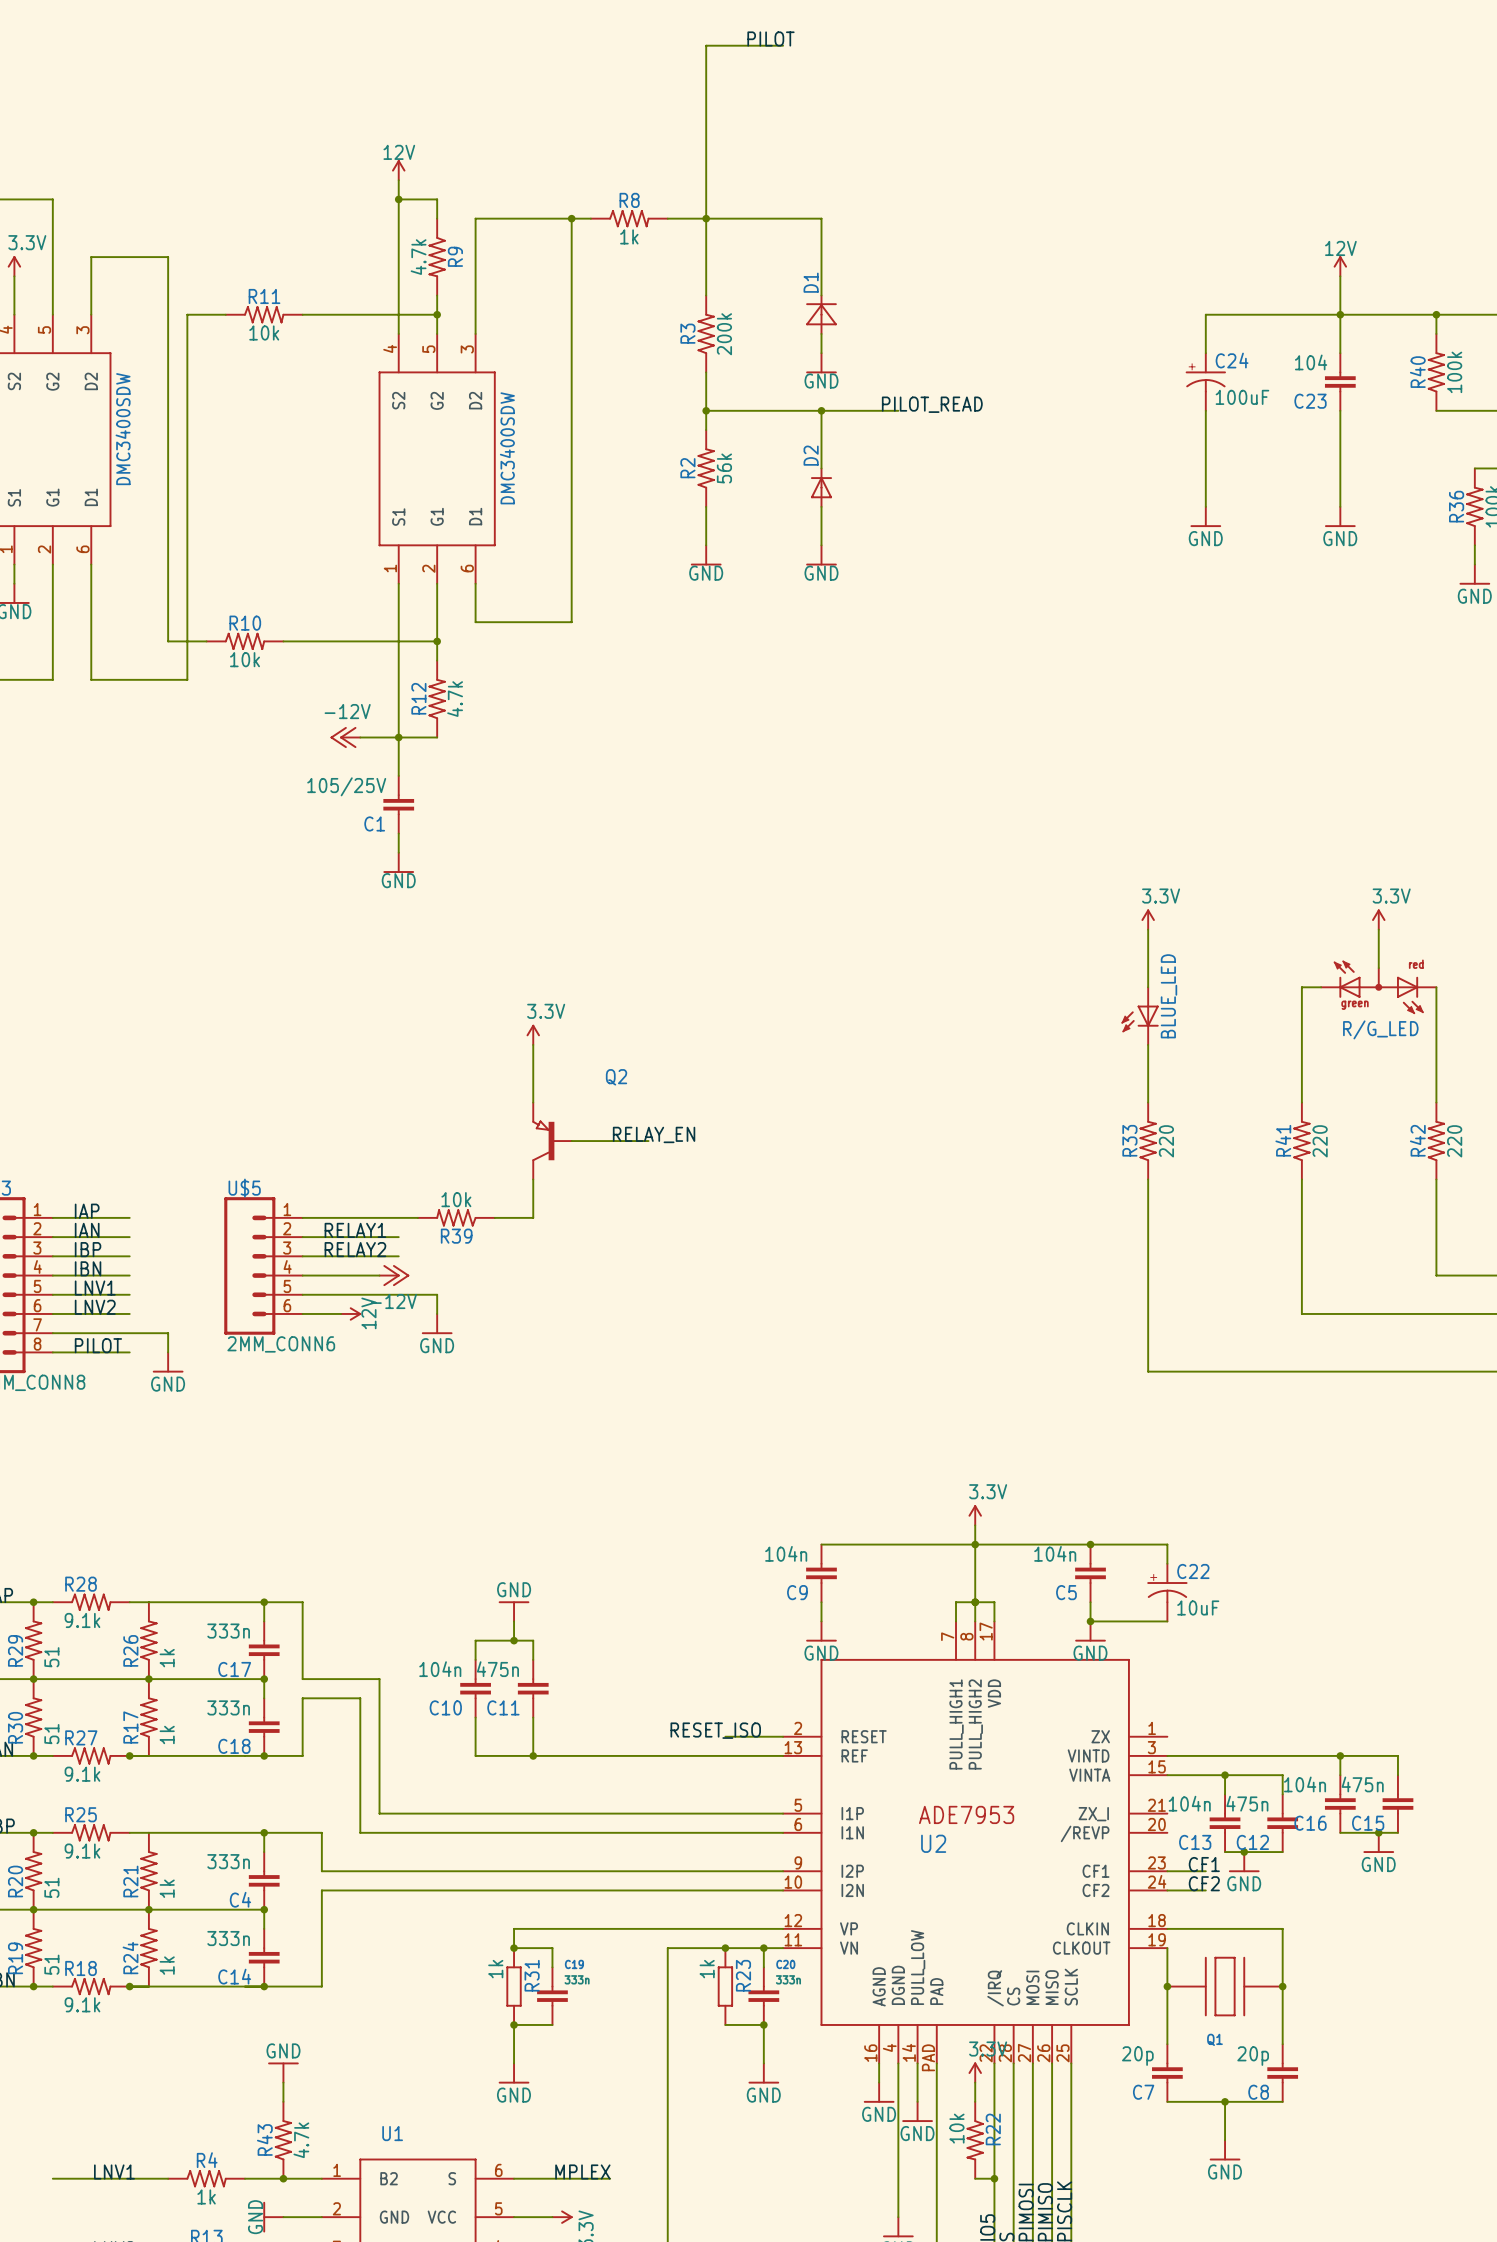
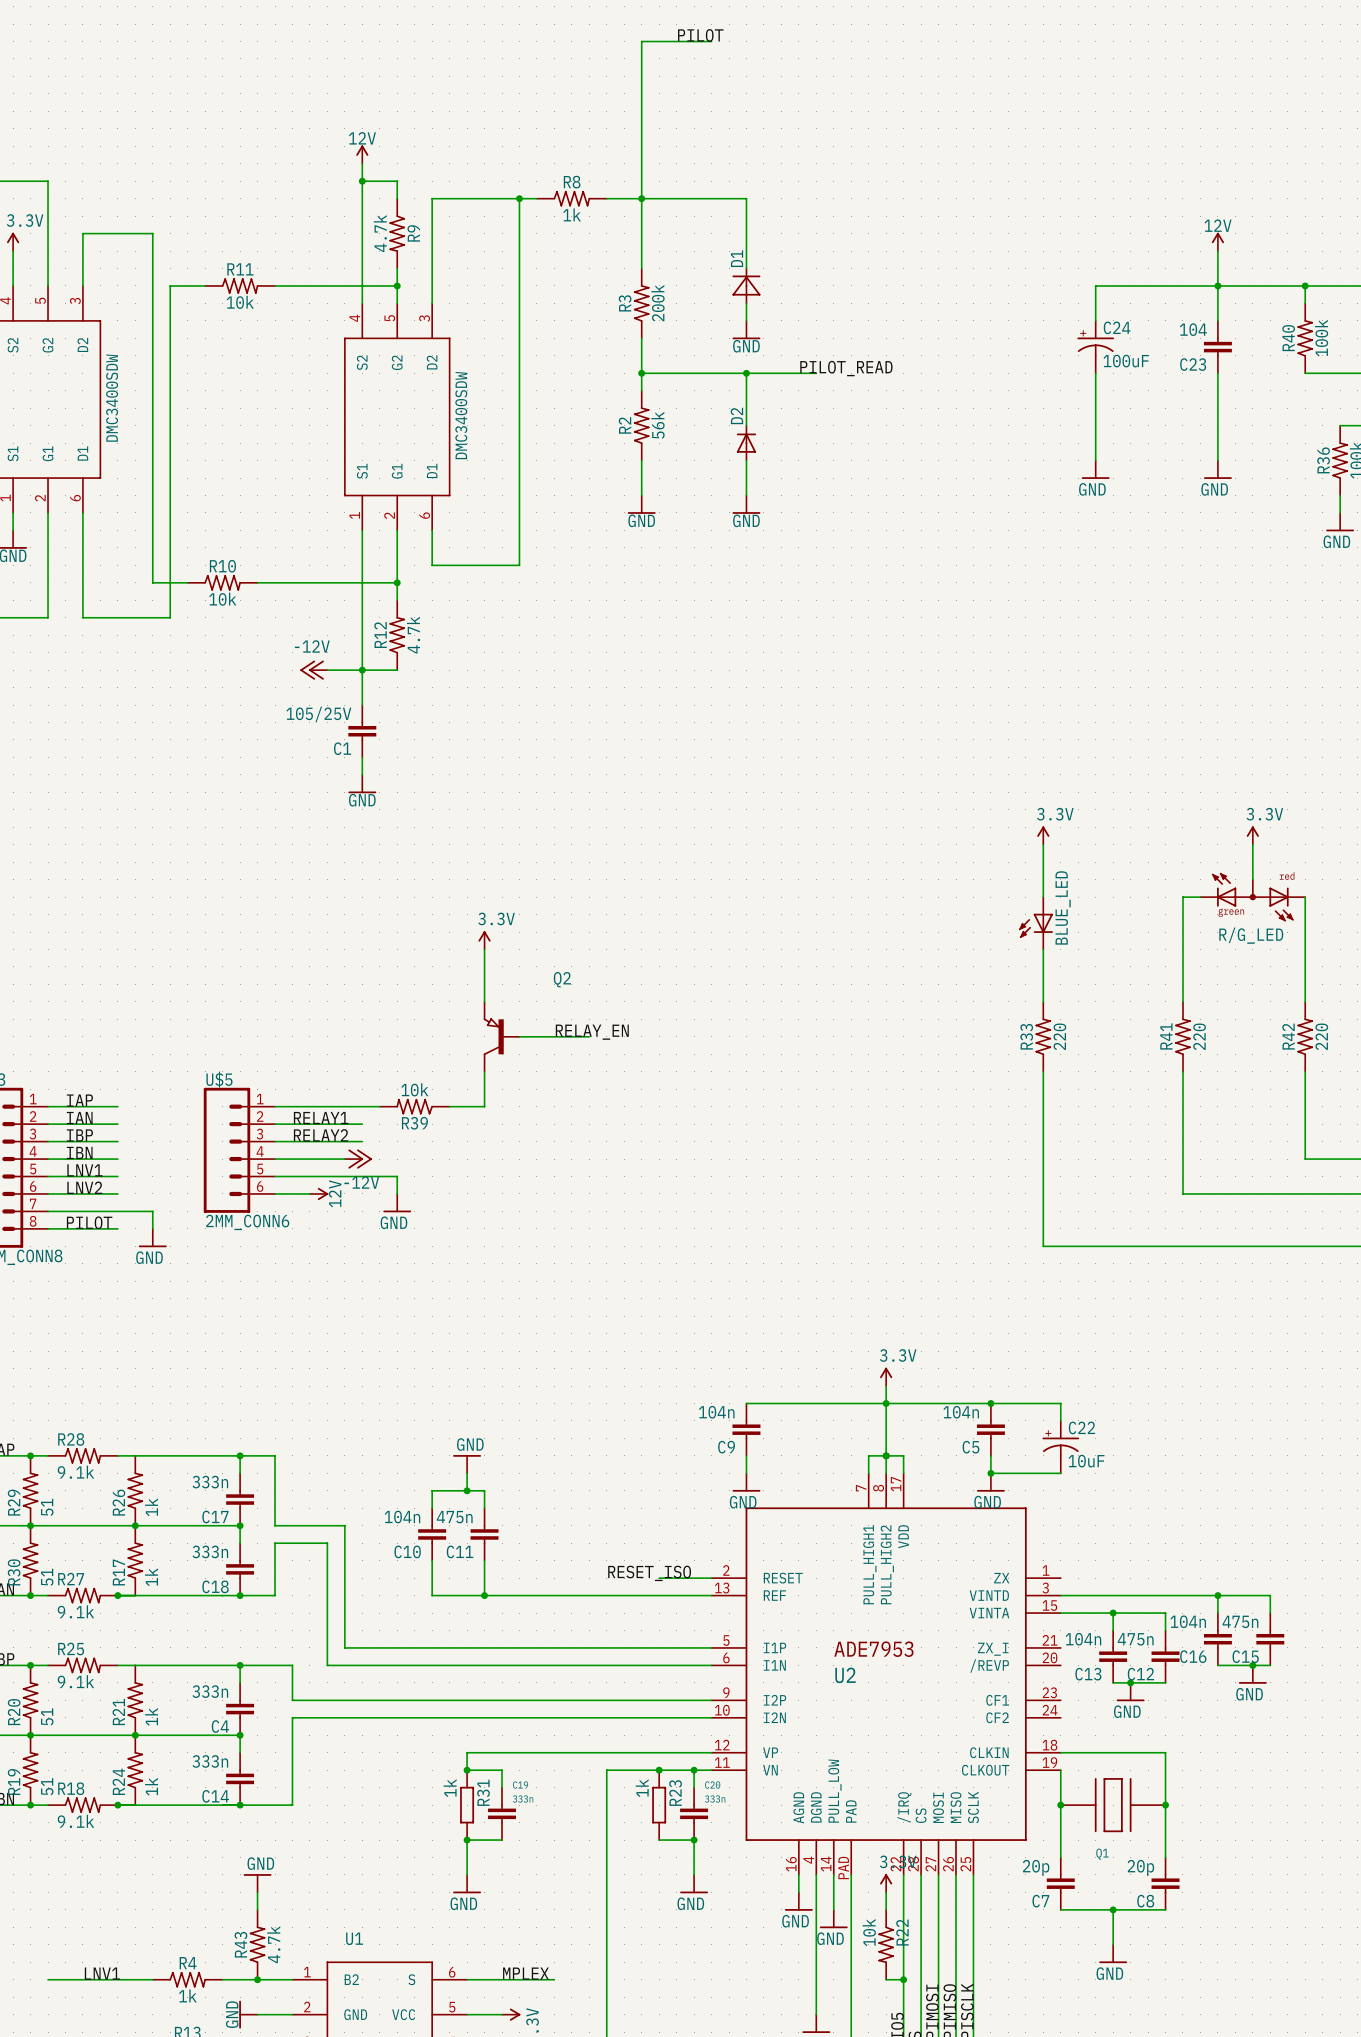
label: CF1 (1204, 1864) -> none
wire: (1167, 1871) (1205, 1871) -> none
label: CF2 (1204, 1883) -> none
wire: (1167, 1890) (1205, 1890) -> none

